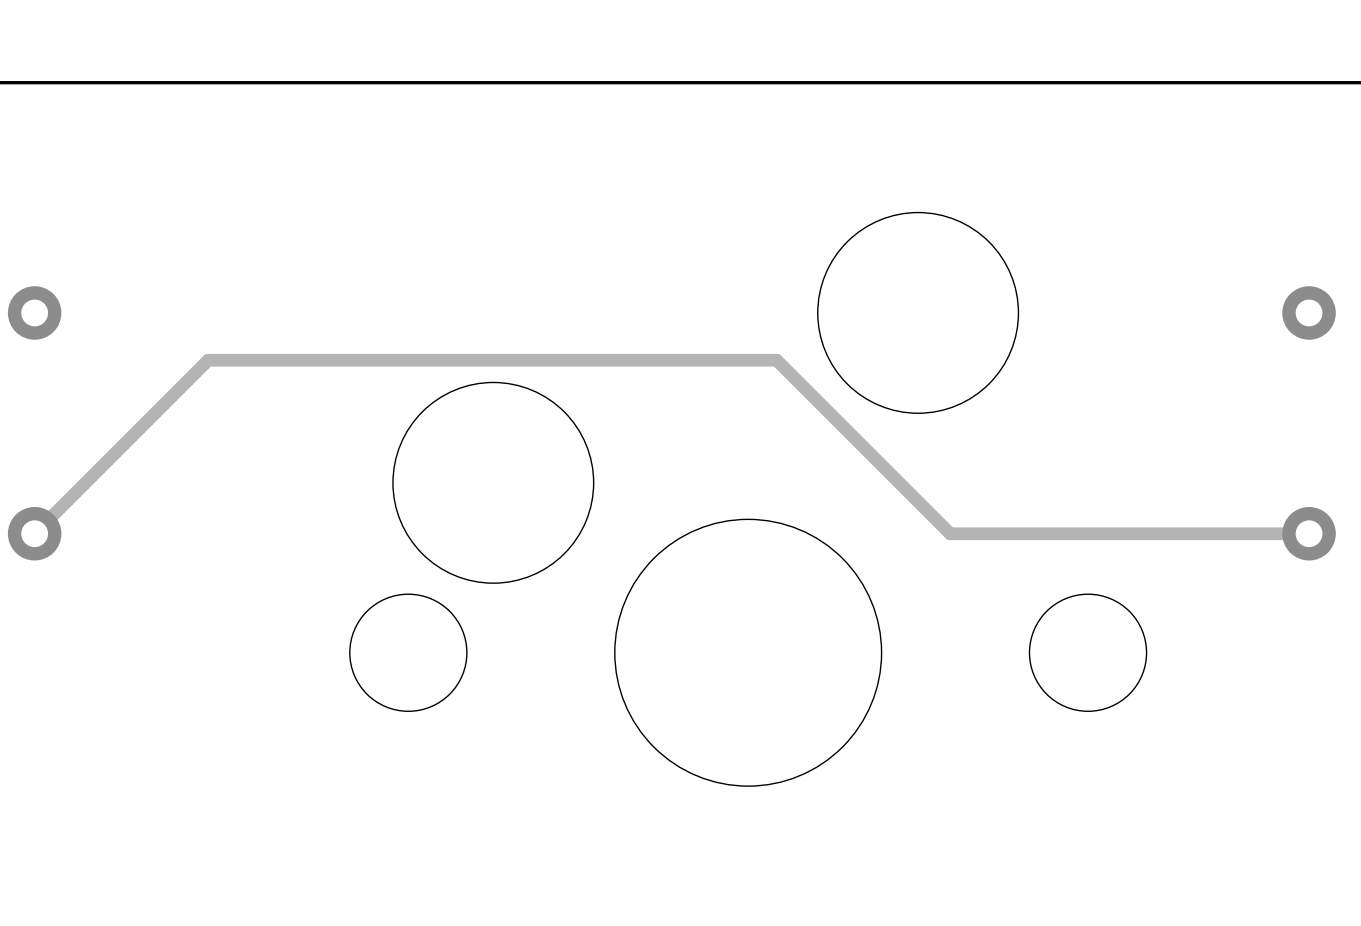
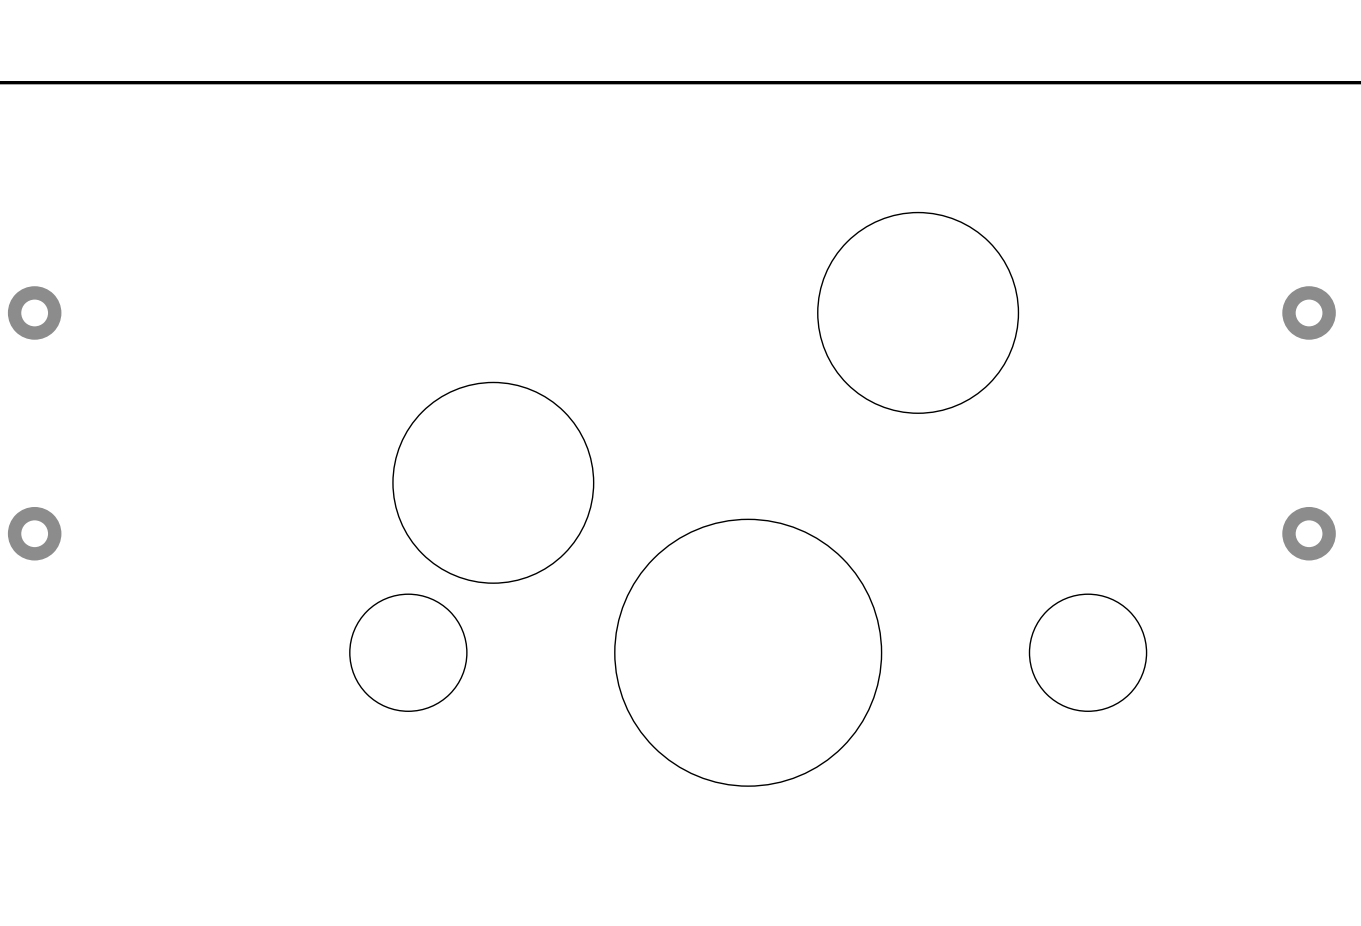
track: (34, 533) (208, 360) (776, 360) (950, 533) (1309, 533) -> none

